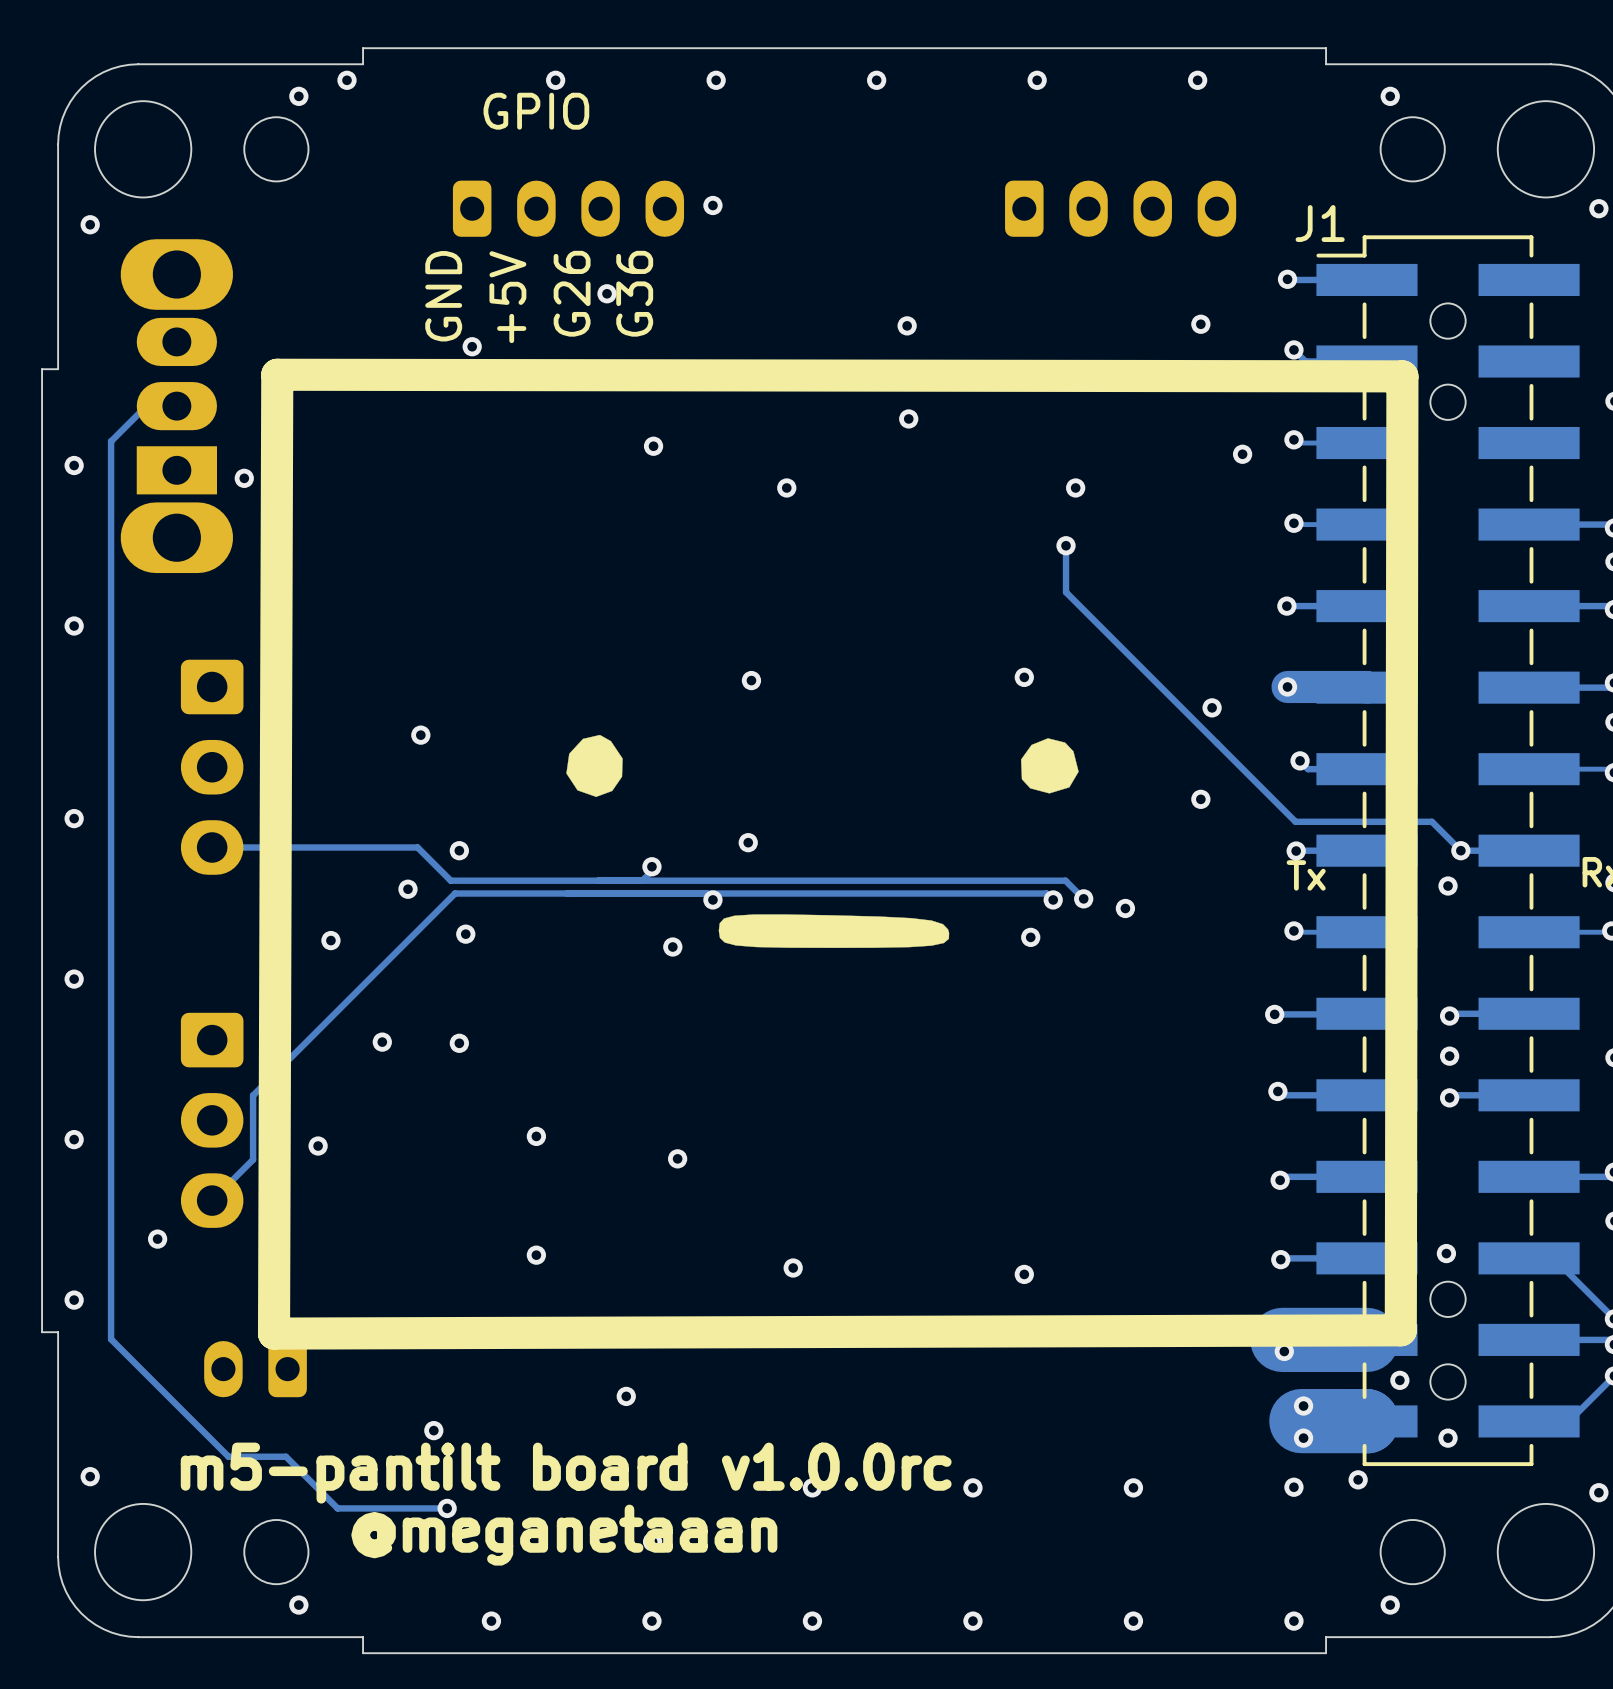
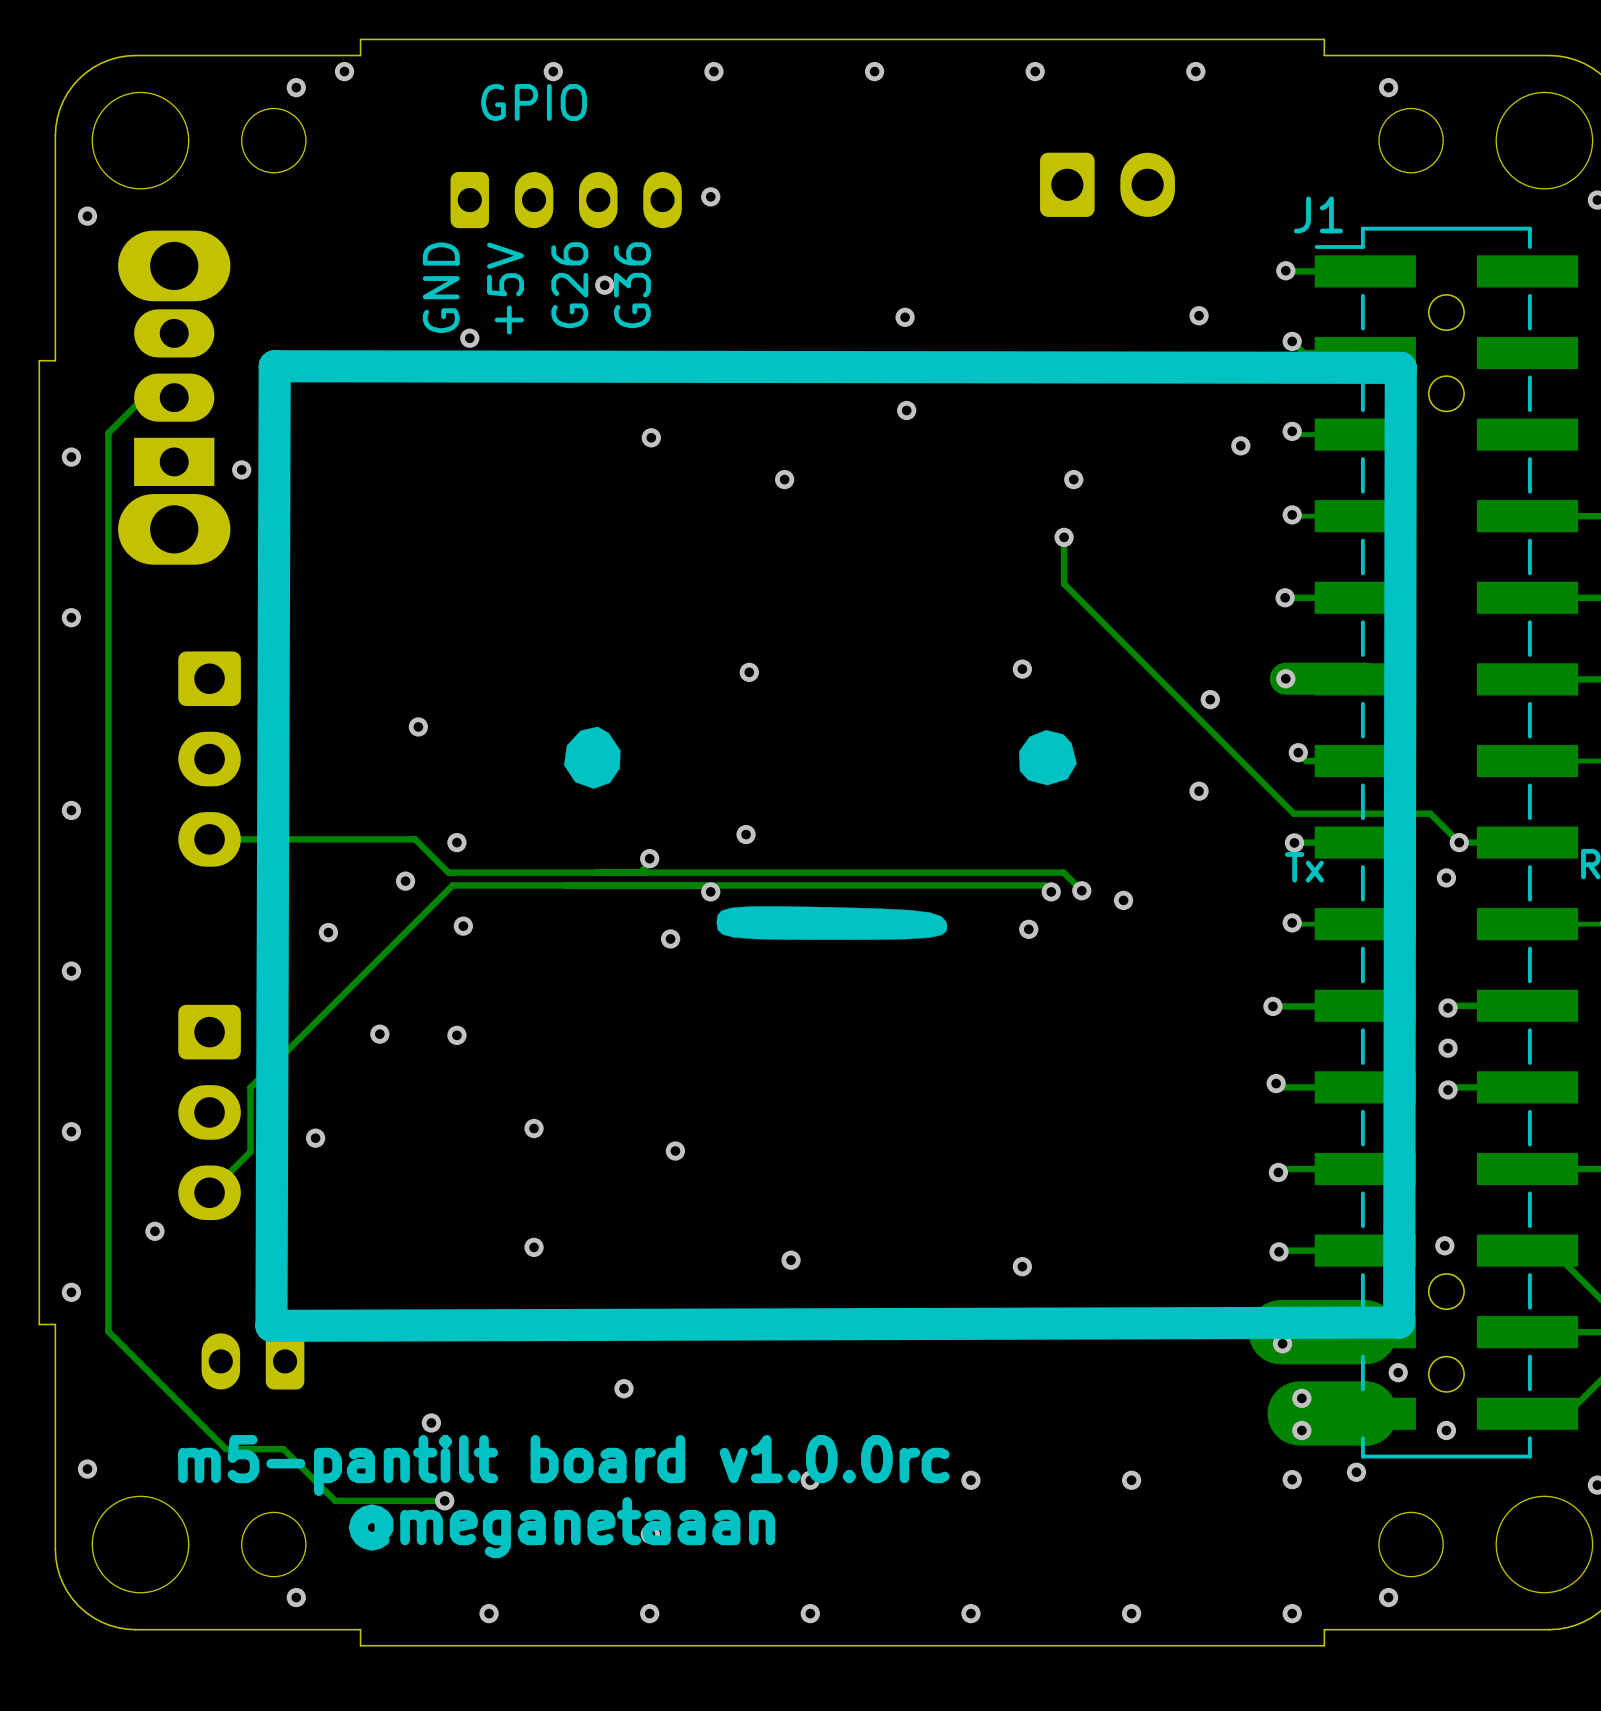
part footprint: [1005, 180, 1237, 237] -> [1040, 152, 1175, 217]

